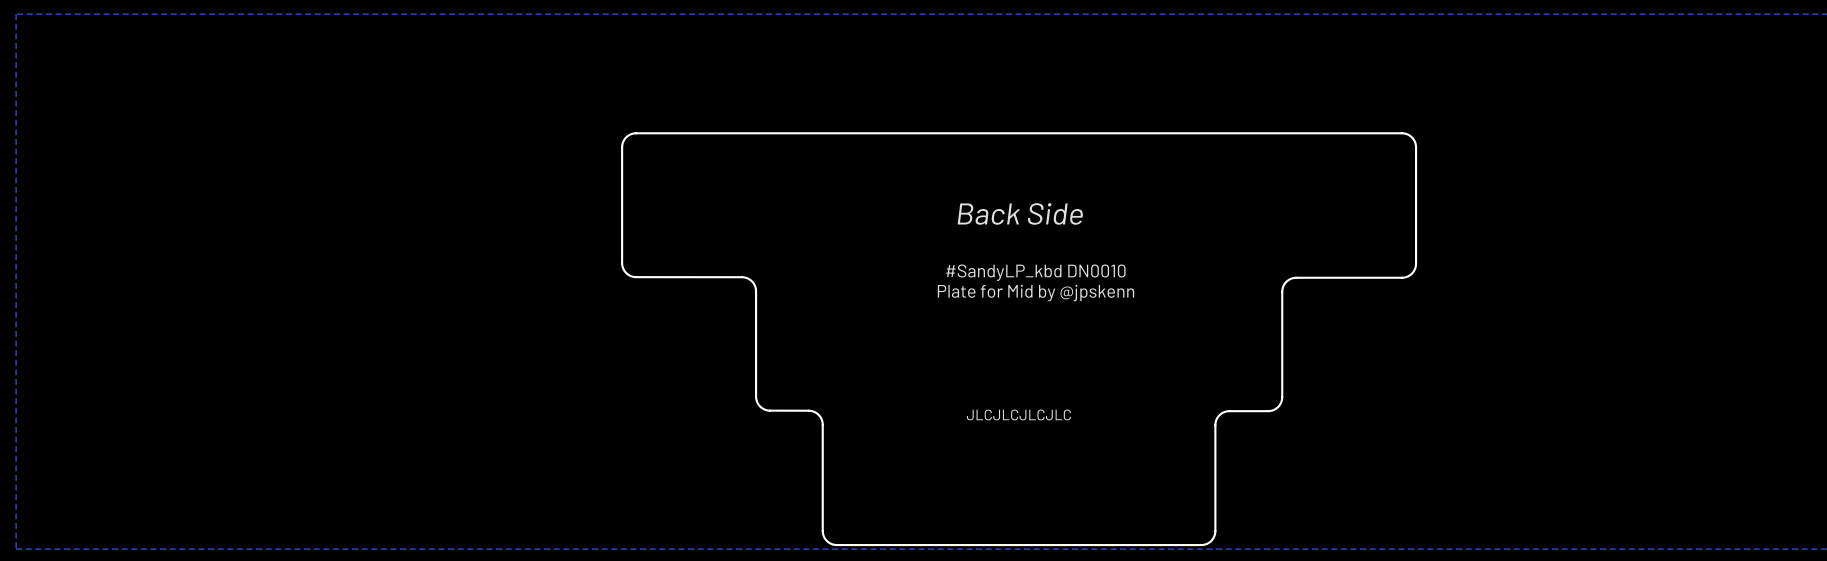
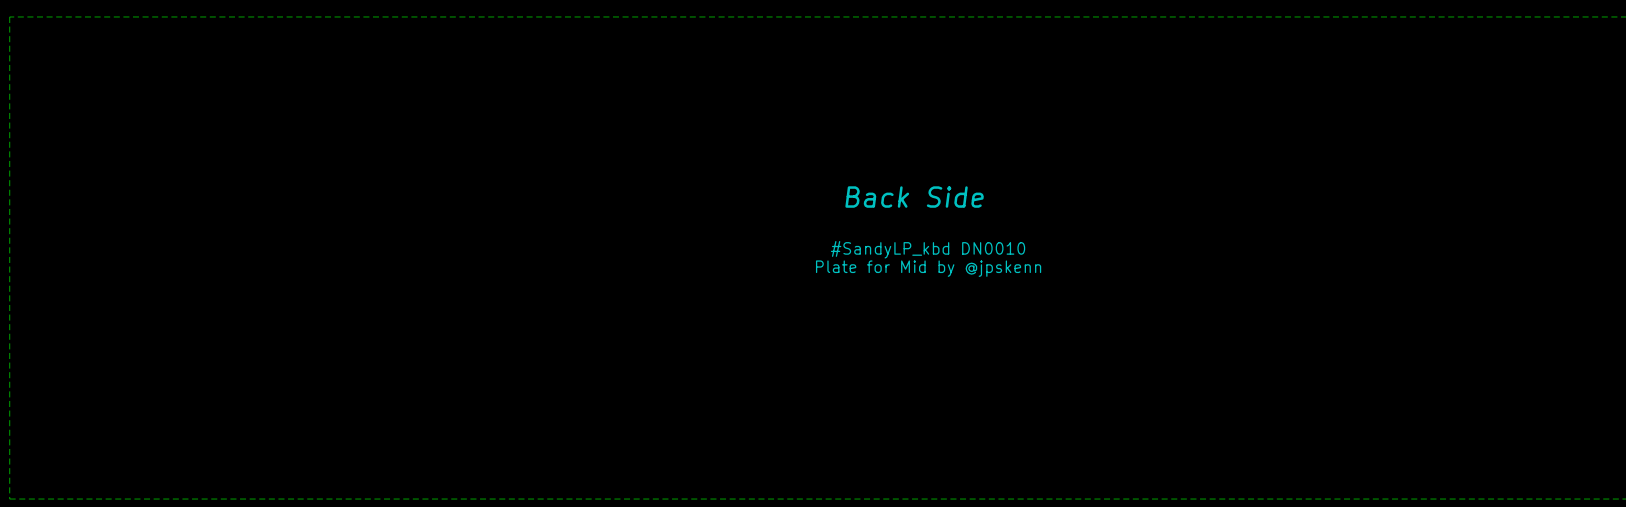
drawing: [621, 132, 1418, 547] -> none
text: JLCJLCJLCJLC (1018, 414) -> none

